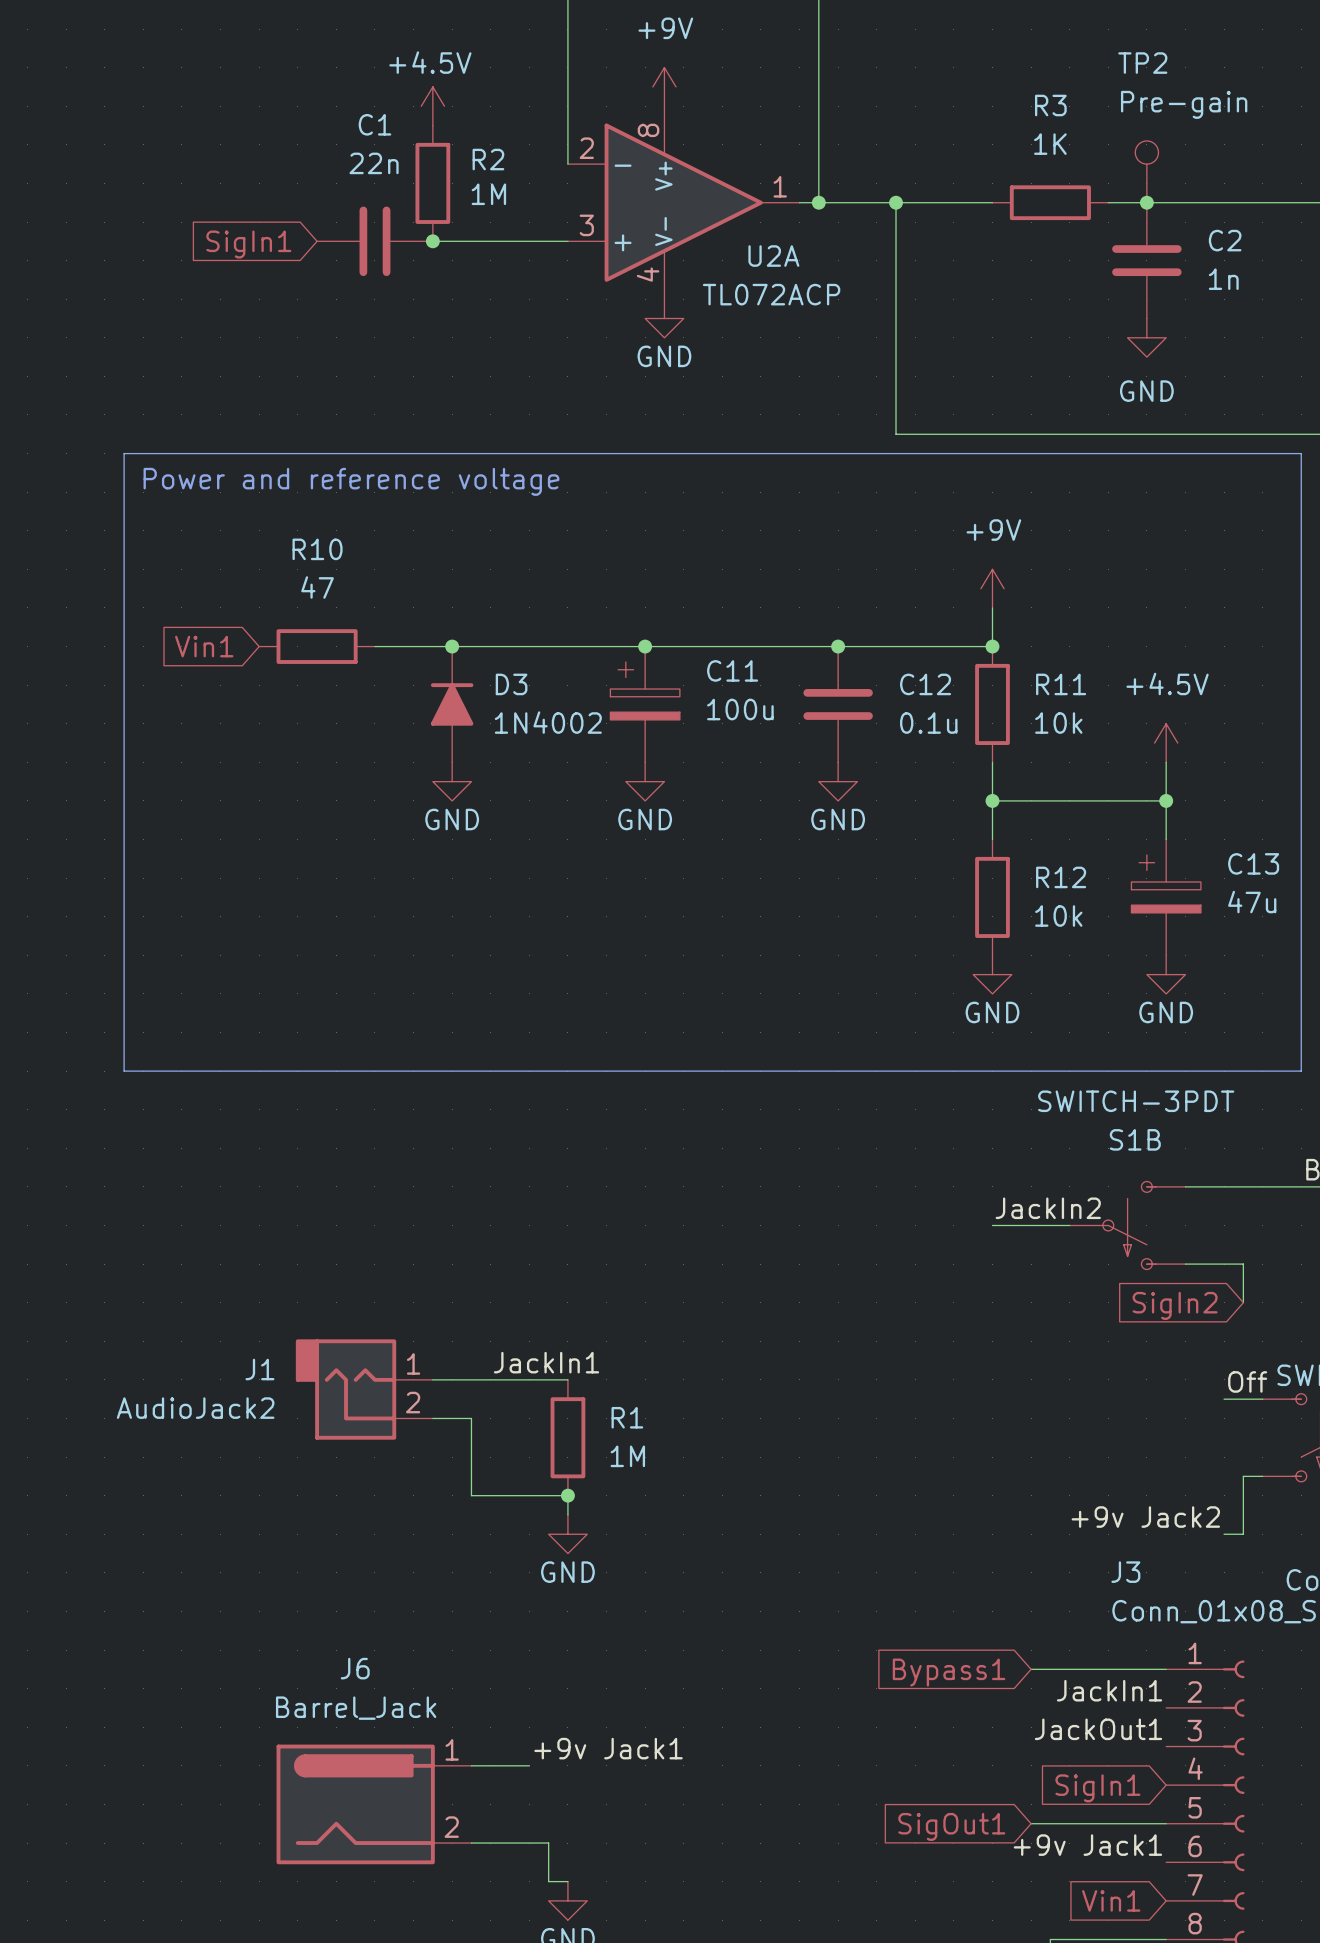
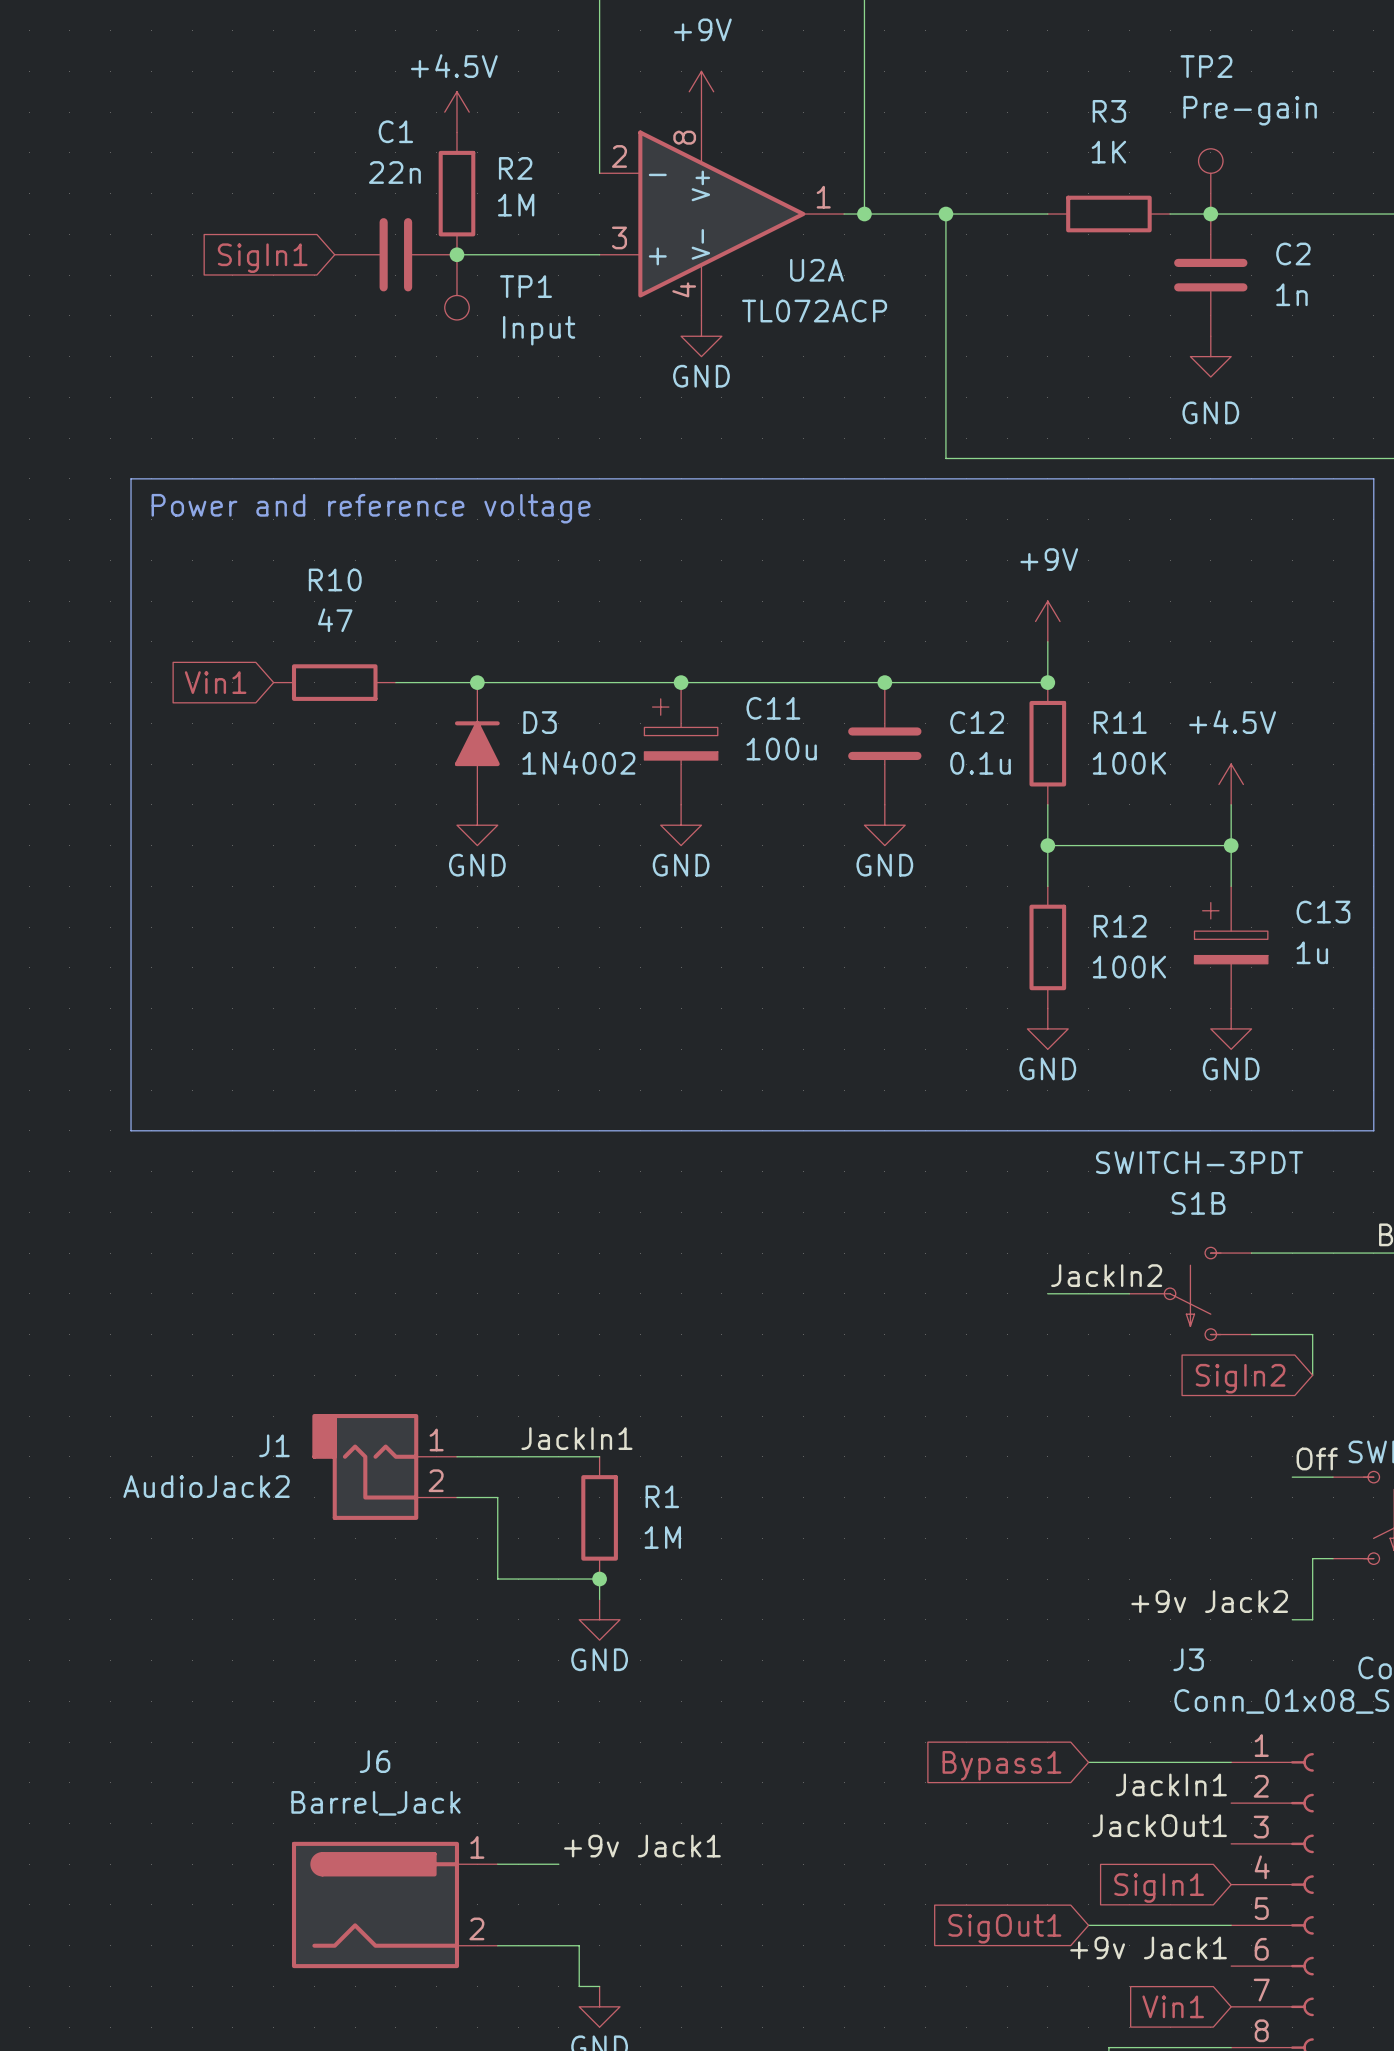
TP1: none -> Input (456, 287)
R11 value: 10k (1058, 723) -> 100K (1129, 763)
C13 value: 47u (1252, 902) -> 1u (1312, 952)
R12 value: 10k (1058, 916) -> 100K (1129, 967)

